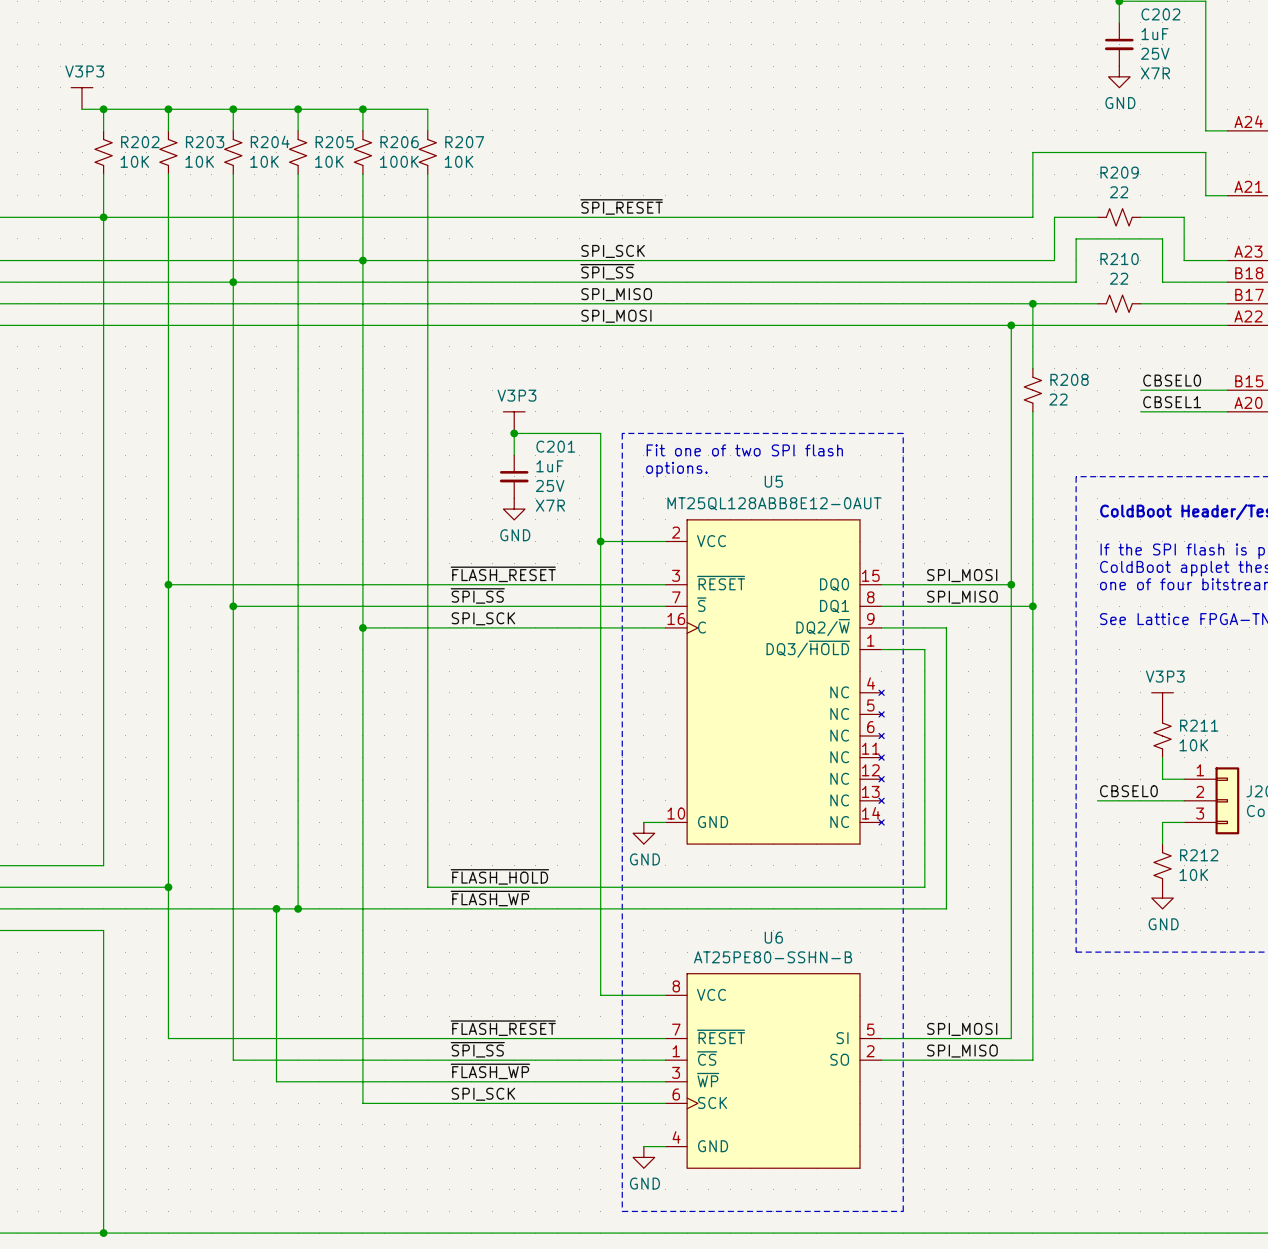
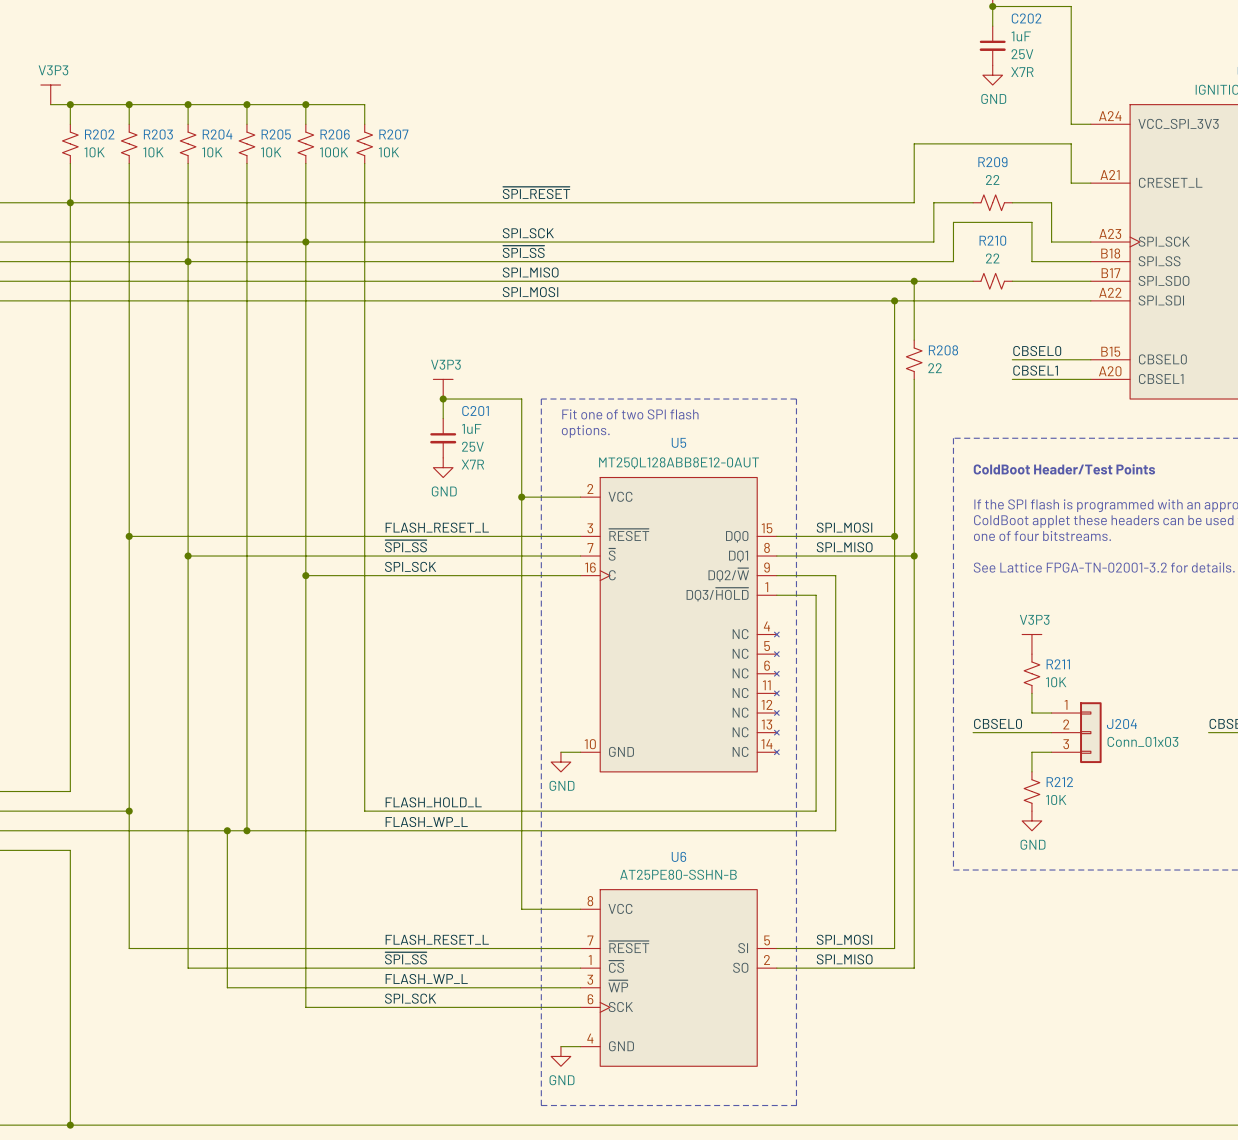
label: ~{FLASH_RESET} (503, 574) -> FLASH_RESET_L (437, 527)
label: ~{FLASH_HOLD} (499, 876) -> FLASH_HOLD_L (433, 802)
label: ~{FLASH_WP} (490, 898) -> FLASH_WP_L (426, 822)
label: ~{FLASH_RESET} (503, 1028) -> FLASH_RESET_L (437, 939)
label: ~{FLASH_WP} (490, 1071) -> FLASH_WP_L (426, 979)

